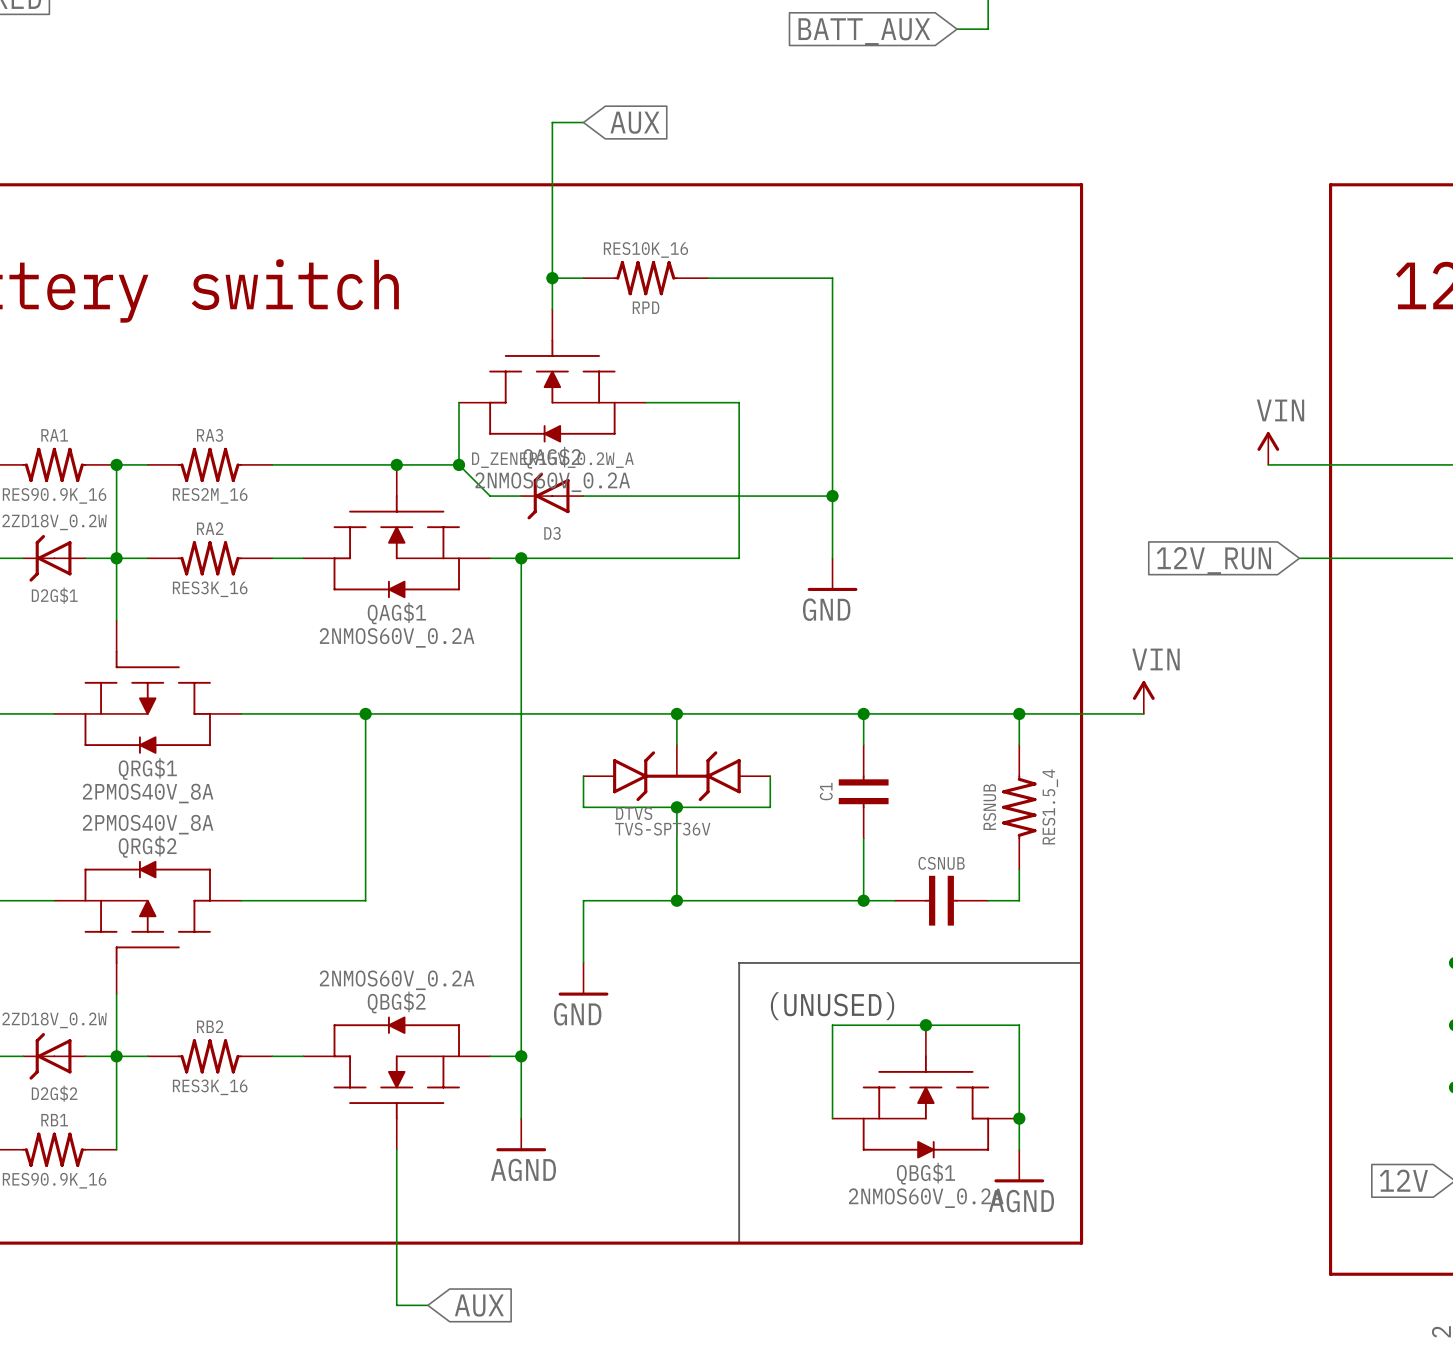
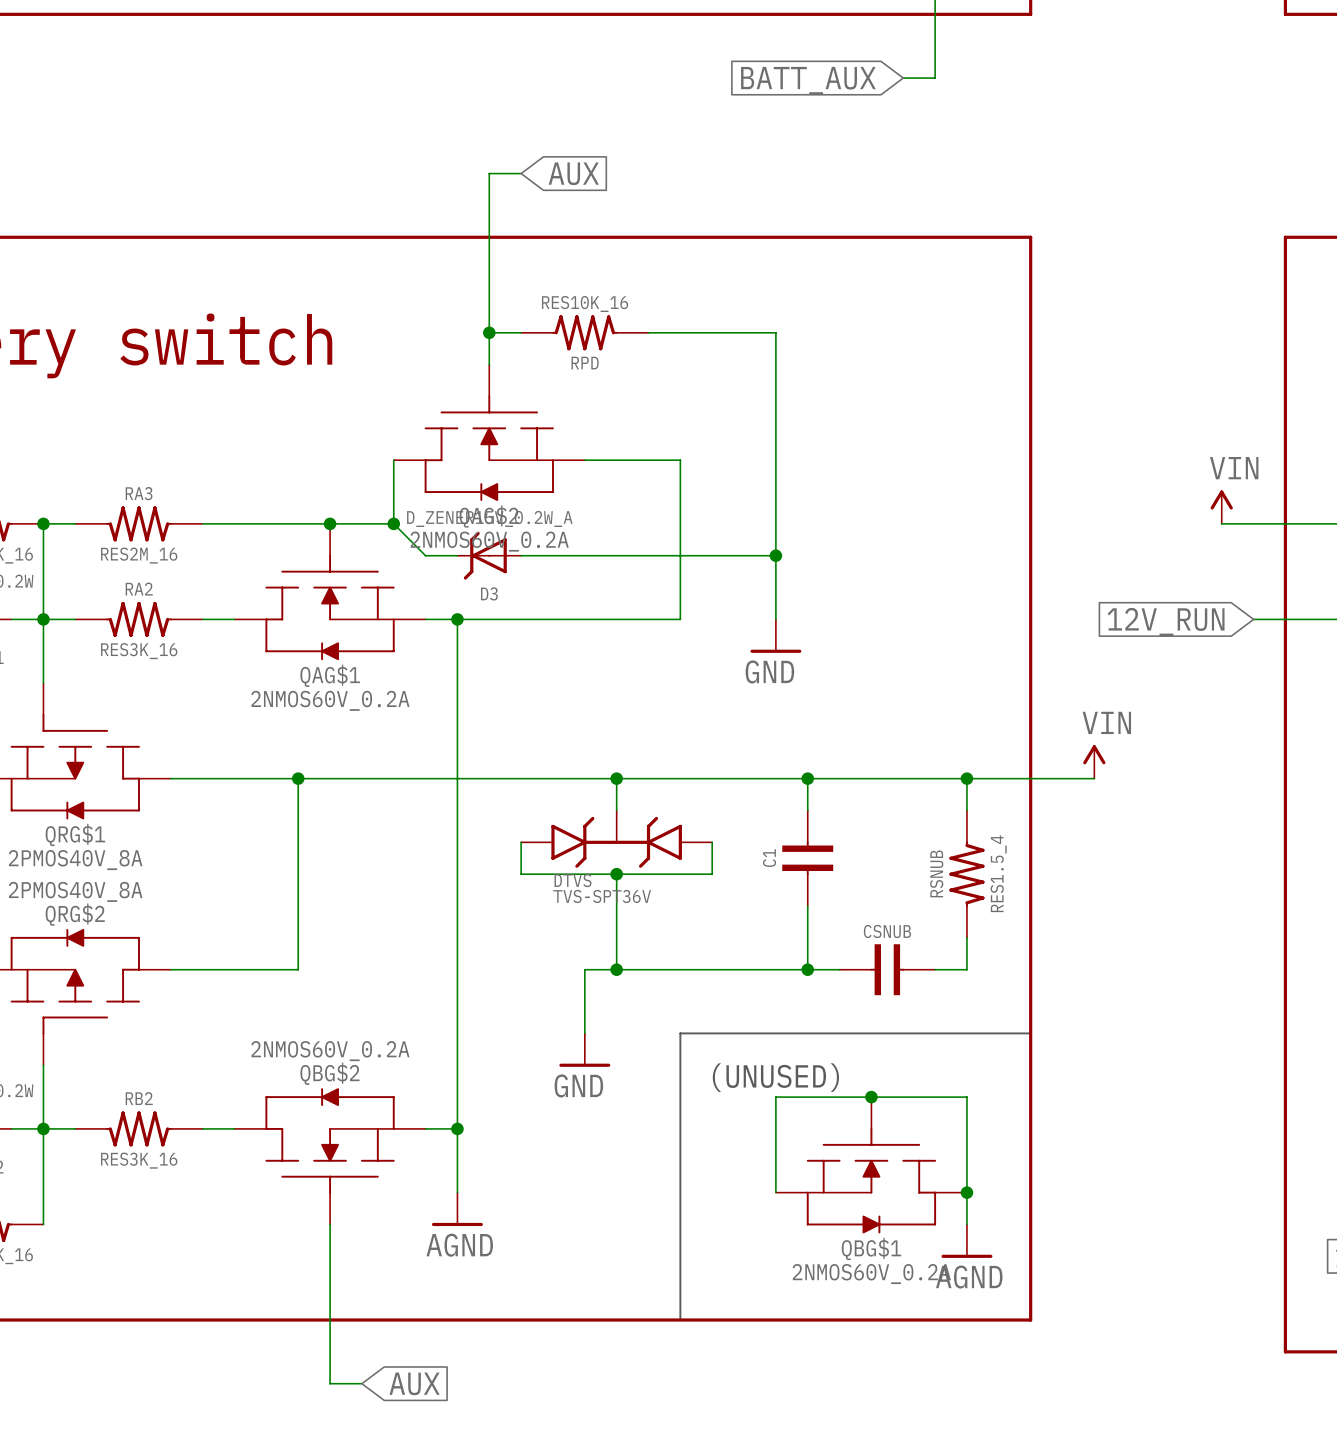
wire: (645, 900) (583, 900) (583, 962) -> (584, 969) (584, 1033)
power symbol position: GND (583, 979) -> GND (584, 1050)

